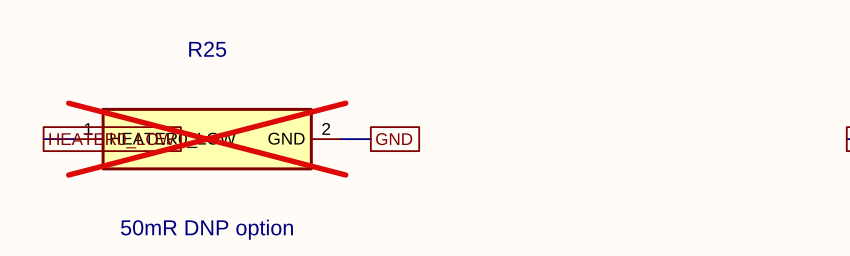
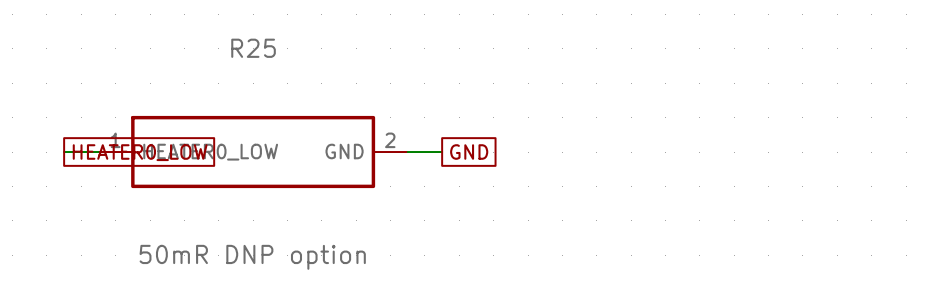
R25 do-not-place cross: (207, 139) -> none

